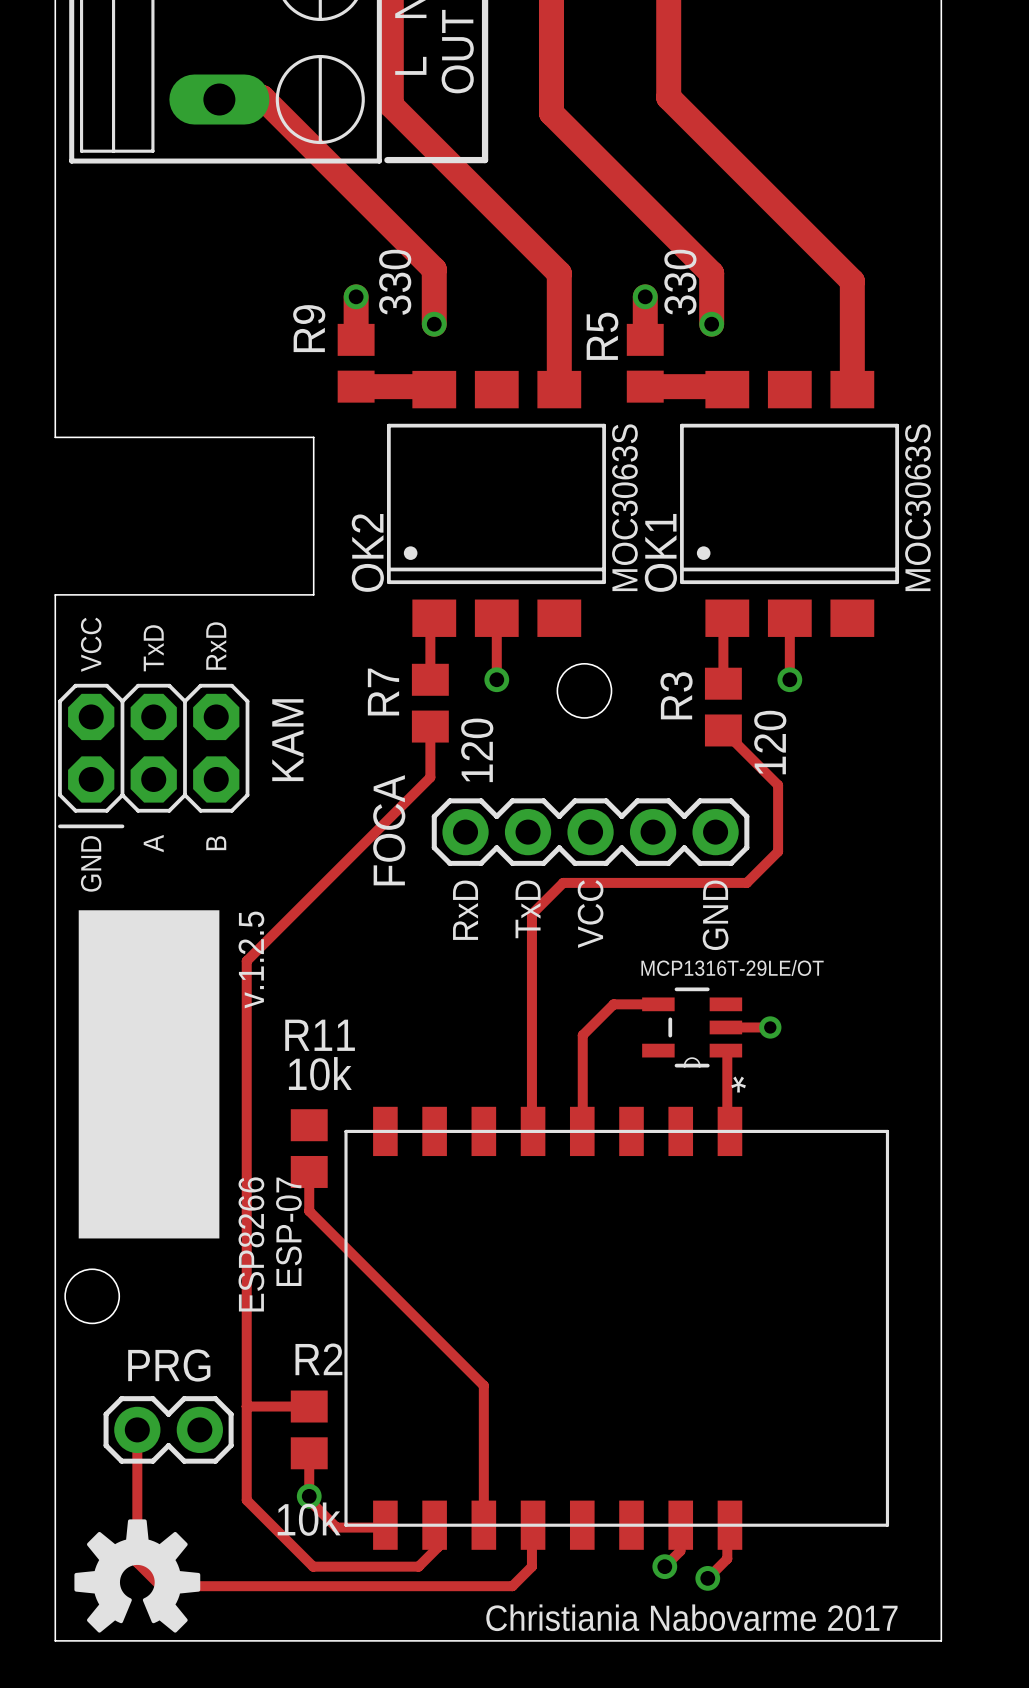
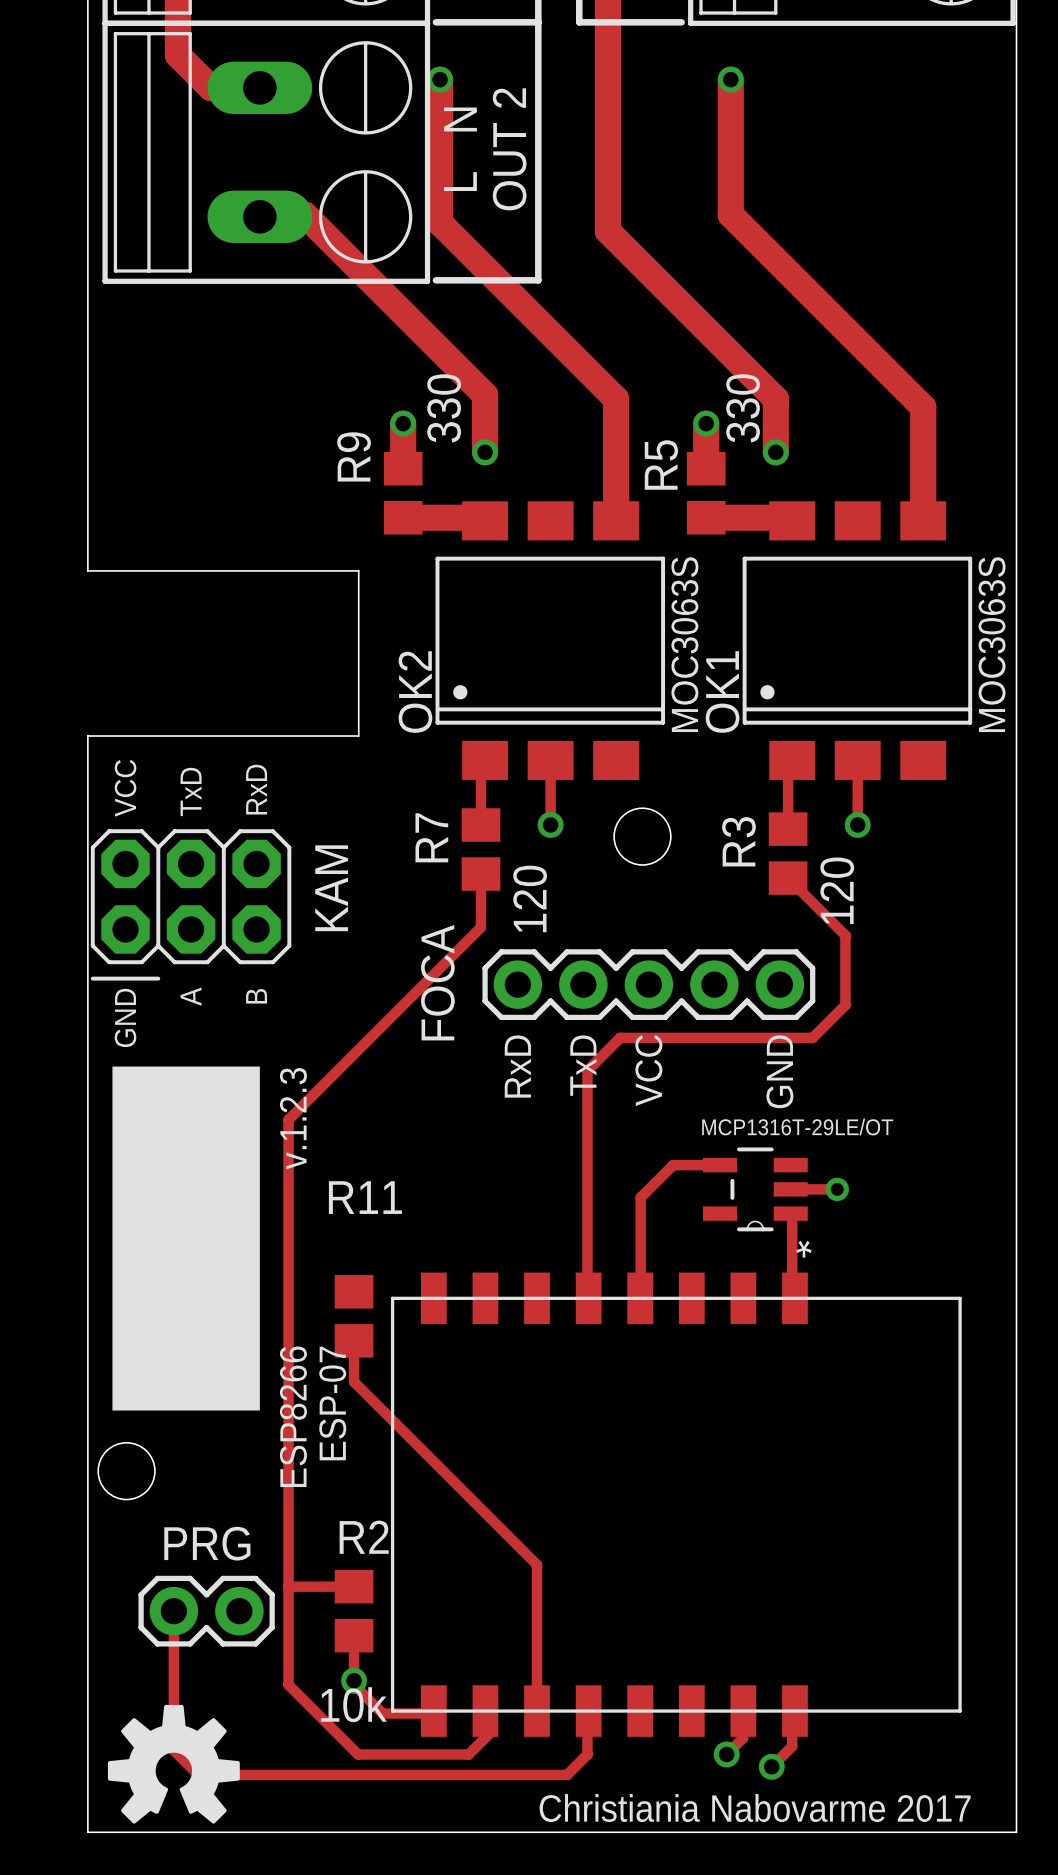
text: v.1.2.5 (251, 959) -> v.1.2.3 (293, 1118)
R11 value: 10k (320, 1073) -> none

